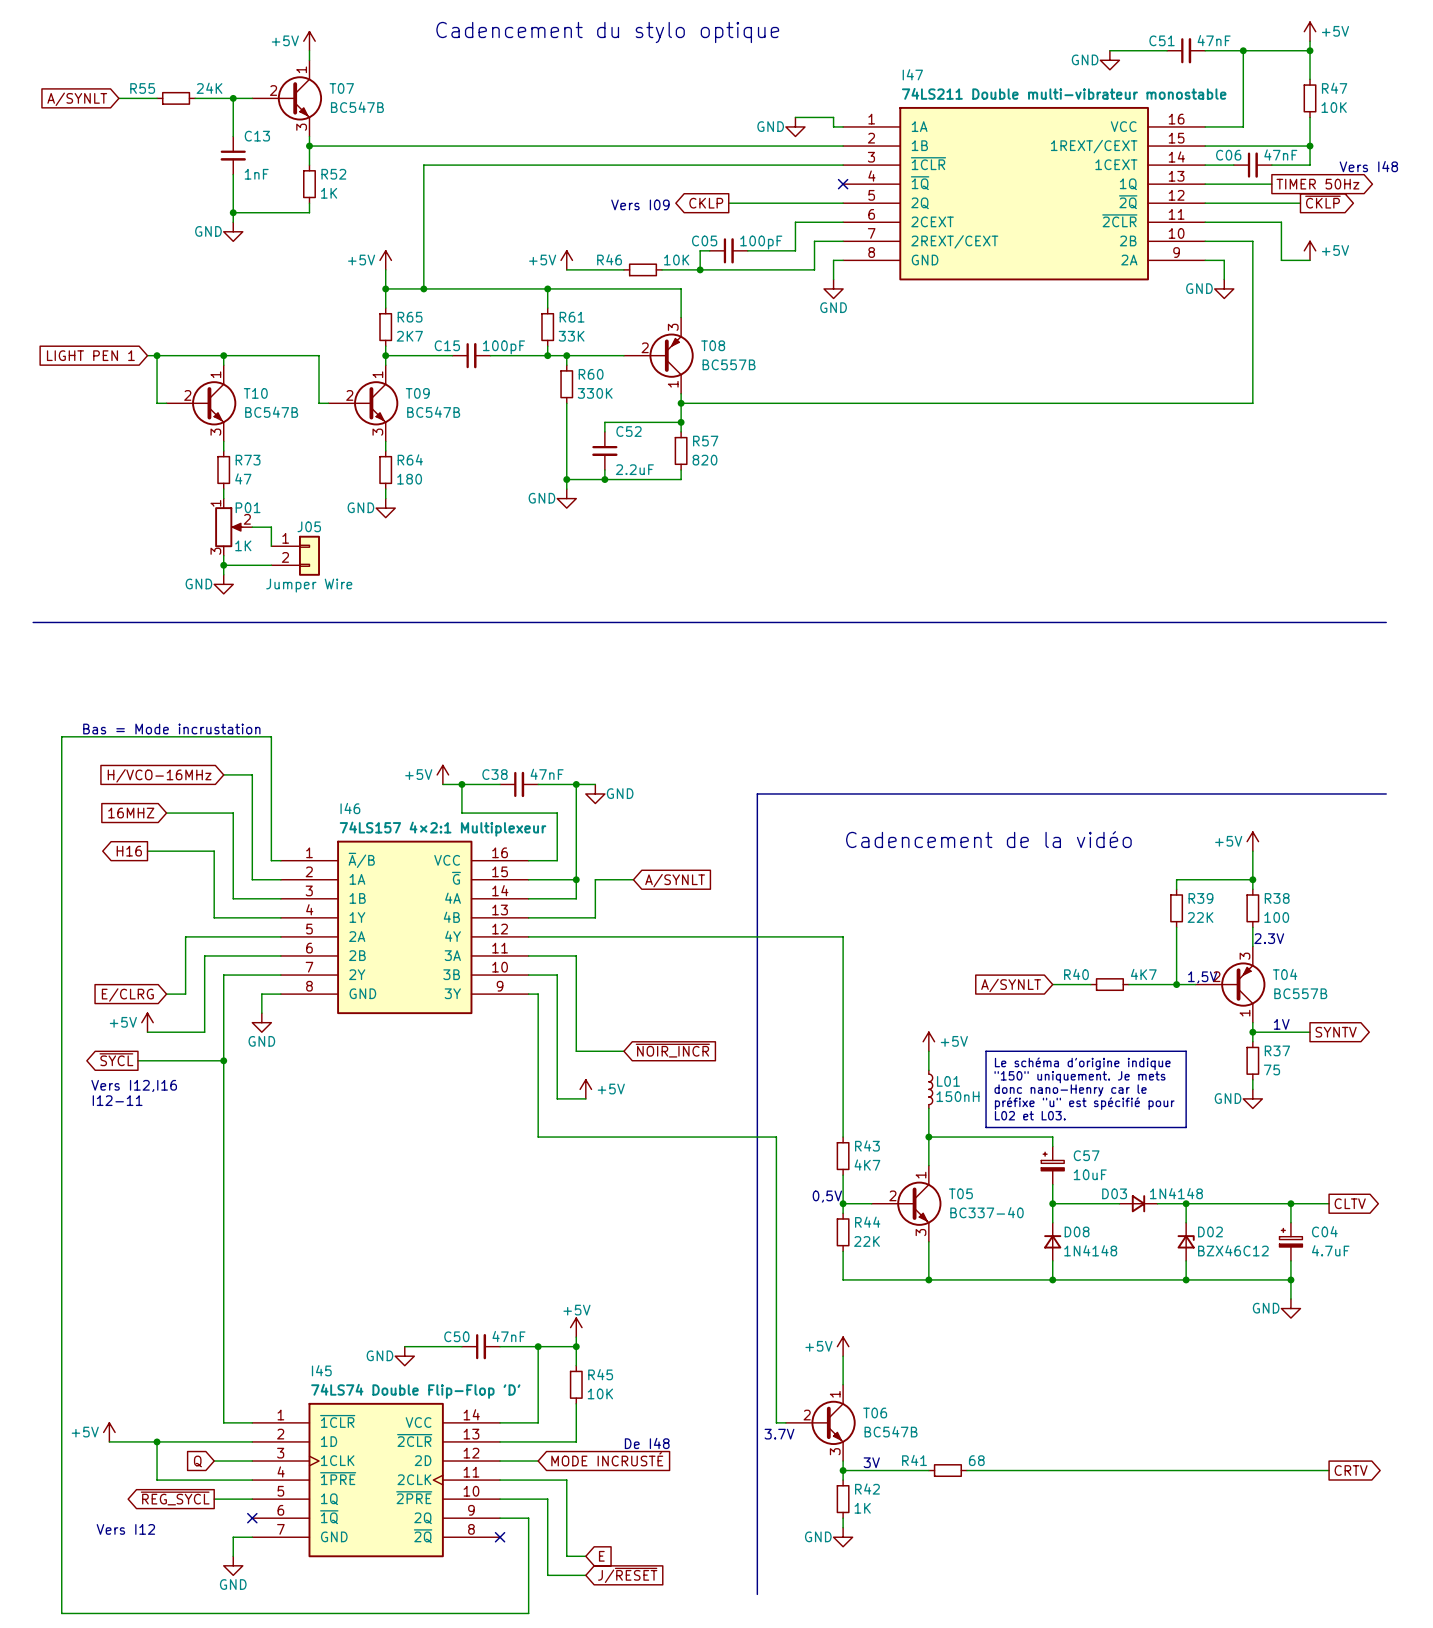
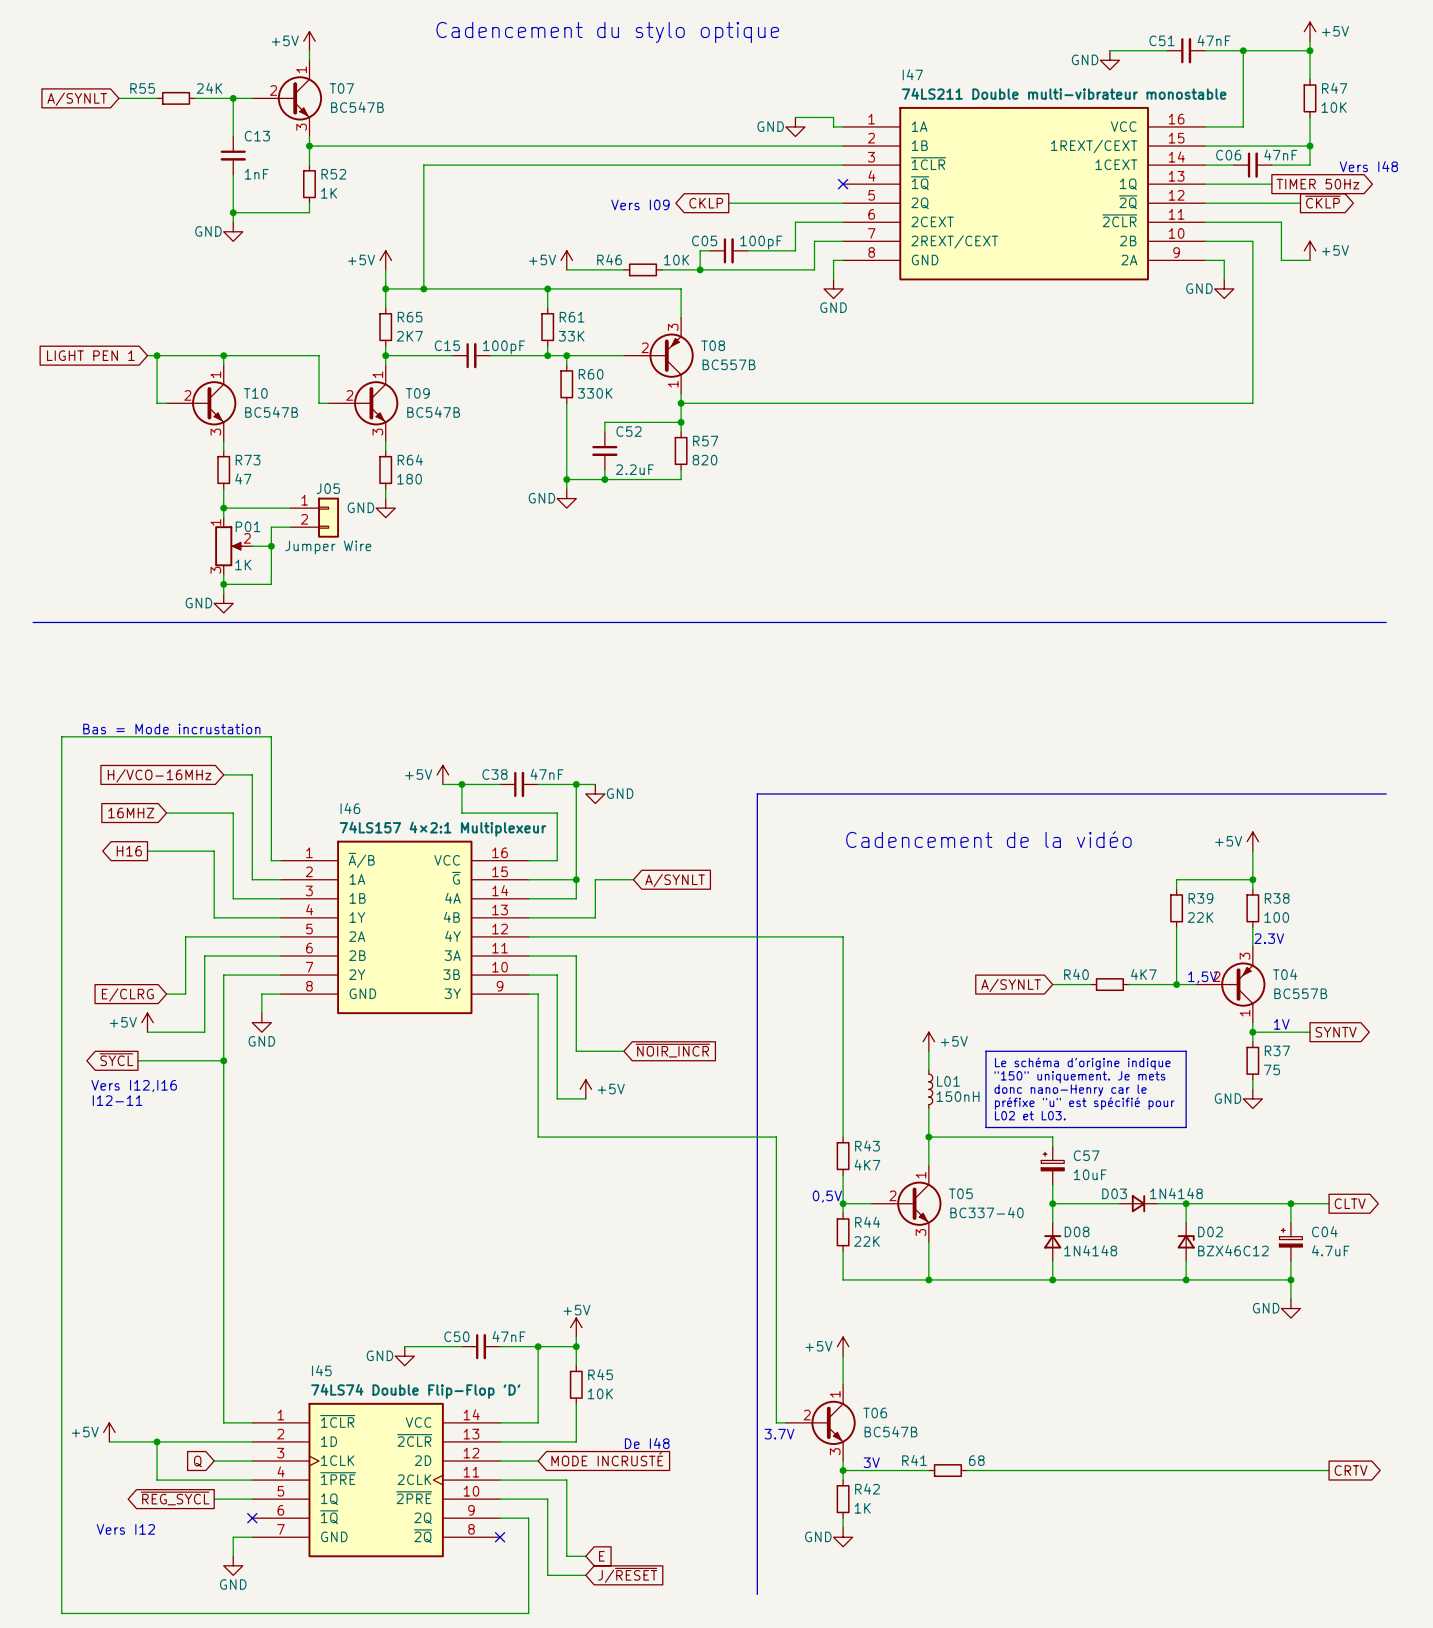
wire: none -> (223, 508) (290, 508)
junction: none -> (223, 508)
P01 position: (233, 527) -> (233, 546)
wire: (252, 527) (271, 527) -> (290, 527) (271, 527)
wire: none -> (252, 546) (271, 546) (271, 584) (223, 584)
junction: none -> (271, 546)
J05 position: (295, 555) -> (314, 517)
wire: (223, 565) (271, 565) -> none
junction position: (223, 565) -> (223, 584)
power symbol position: GND (223, 584) -> GND (223, 603)

